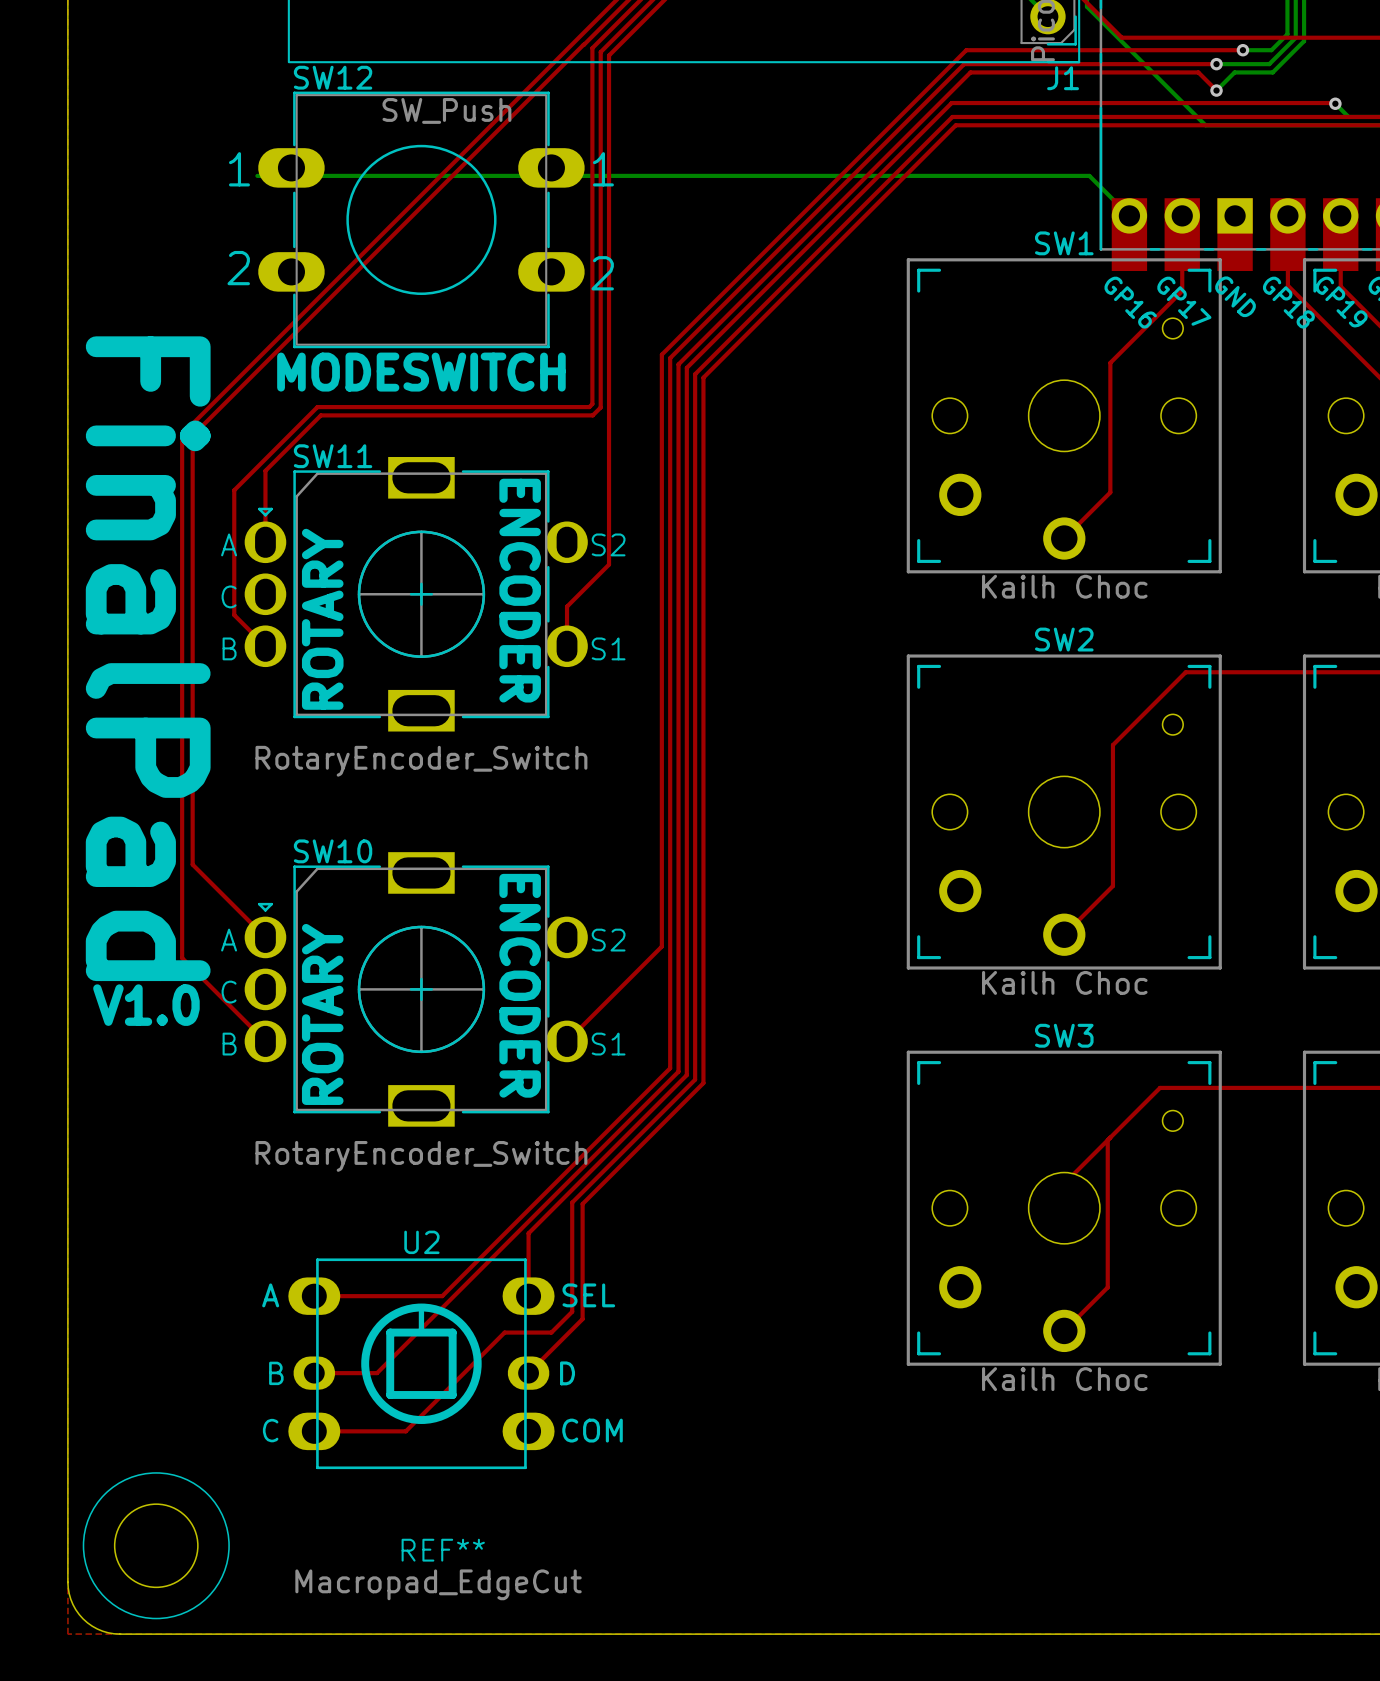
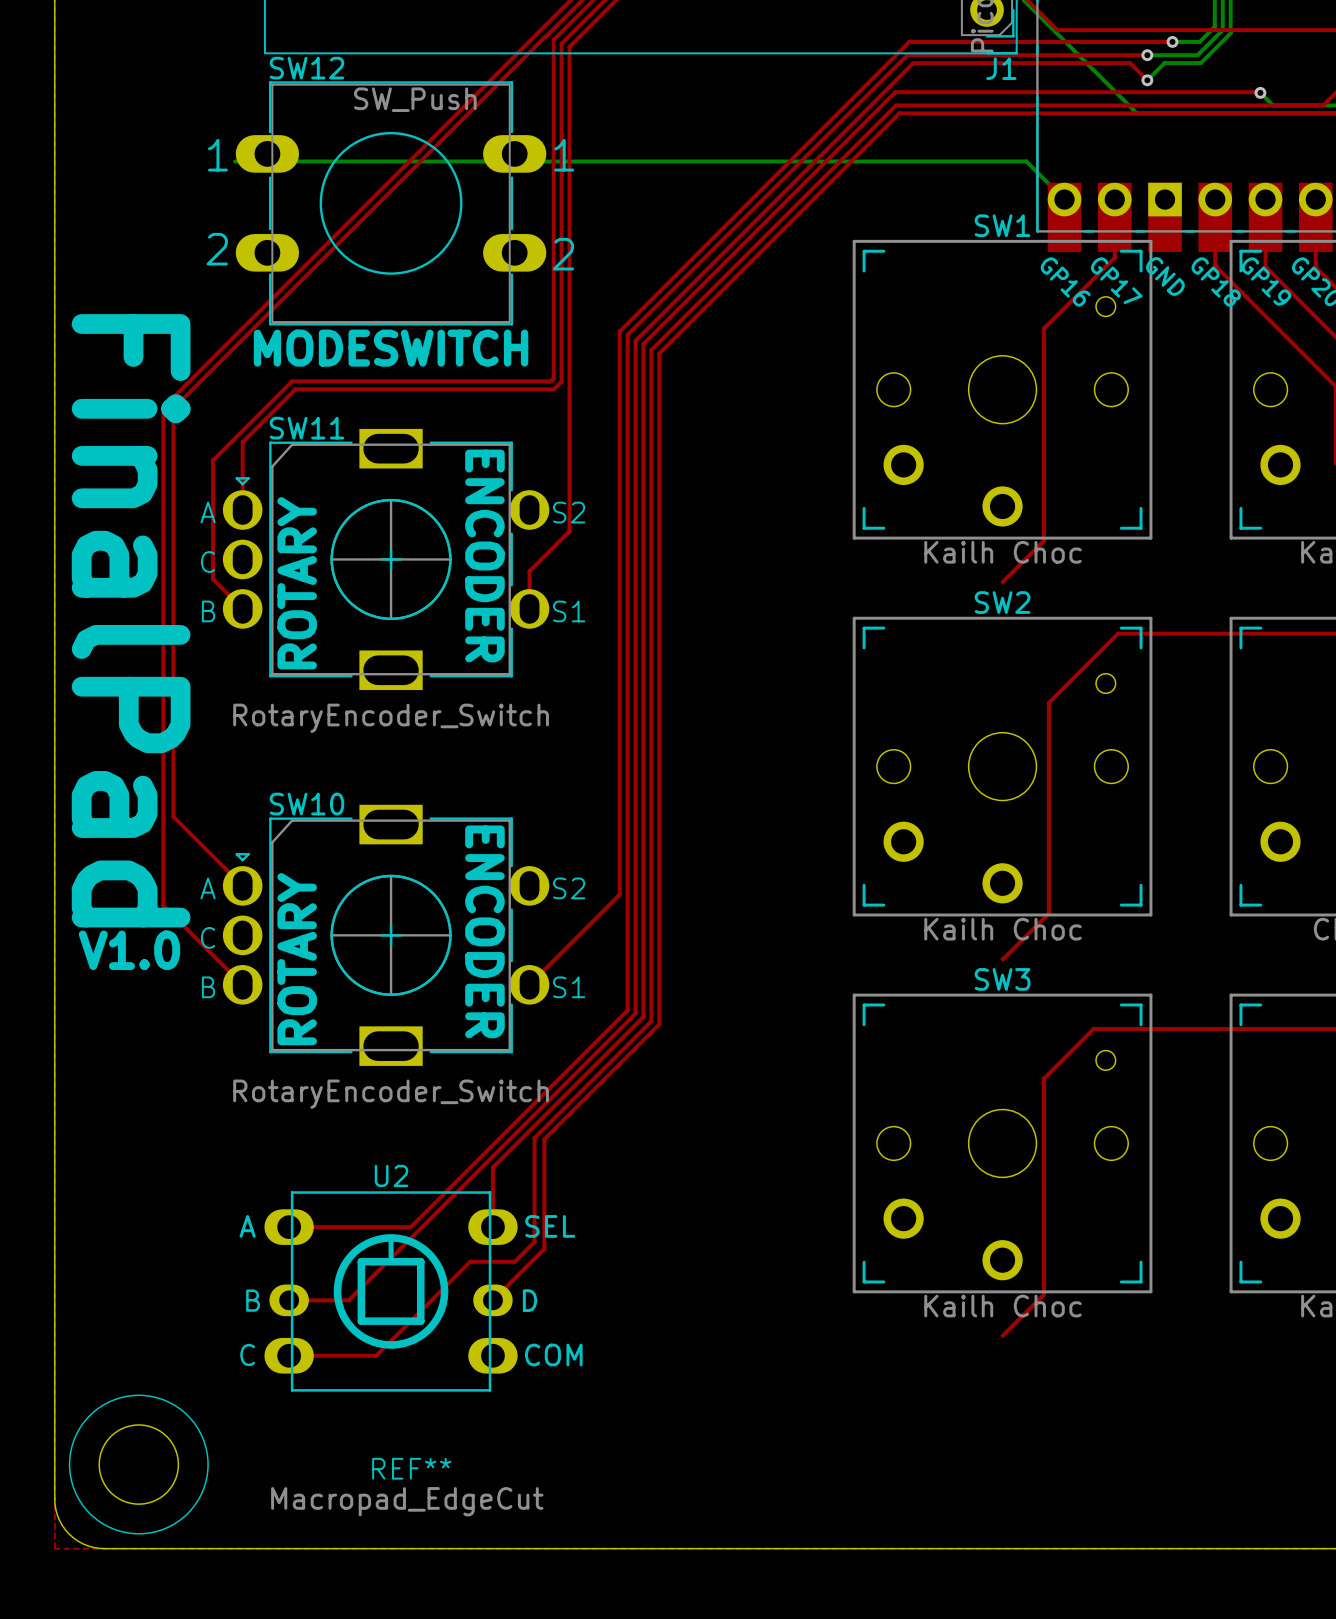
top track: (1182, 277) (1182, 290) (1110, 362) (1110, 492) (1064, 538) -> (1114, 257) (1043, 328) (1043, 540) (1002, 582)
top track: (1112, 886) (1064, 934) -> (1048, 837) (1048, 913) (1002, 959)
top track: (1107, 1140) (1064, 1183) (1064, 1208) -> none
top track: (1107, 1287) (1064, 1330) -> (1043, 1218) (1043, 1294) (1002, 1335)

